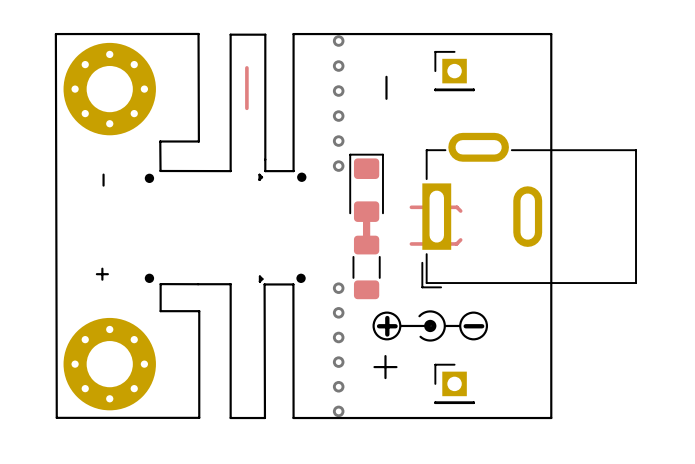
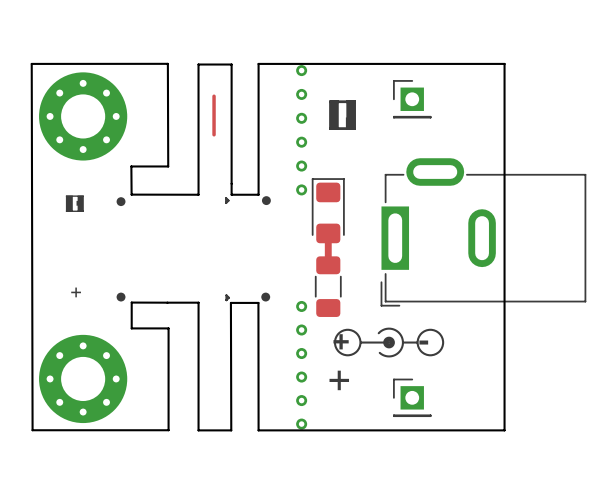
drawing: none -> [329, 100, 356, 130]
drawing: none -> [65, 195, 84, 212]
track: (411, 207) (456, 207) (460, 211) -> none
track: (460, 239) (456, 243) (411, 243) -> none

